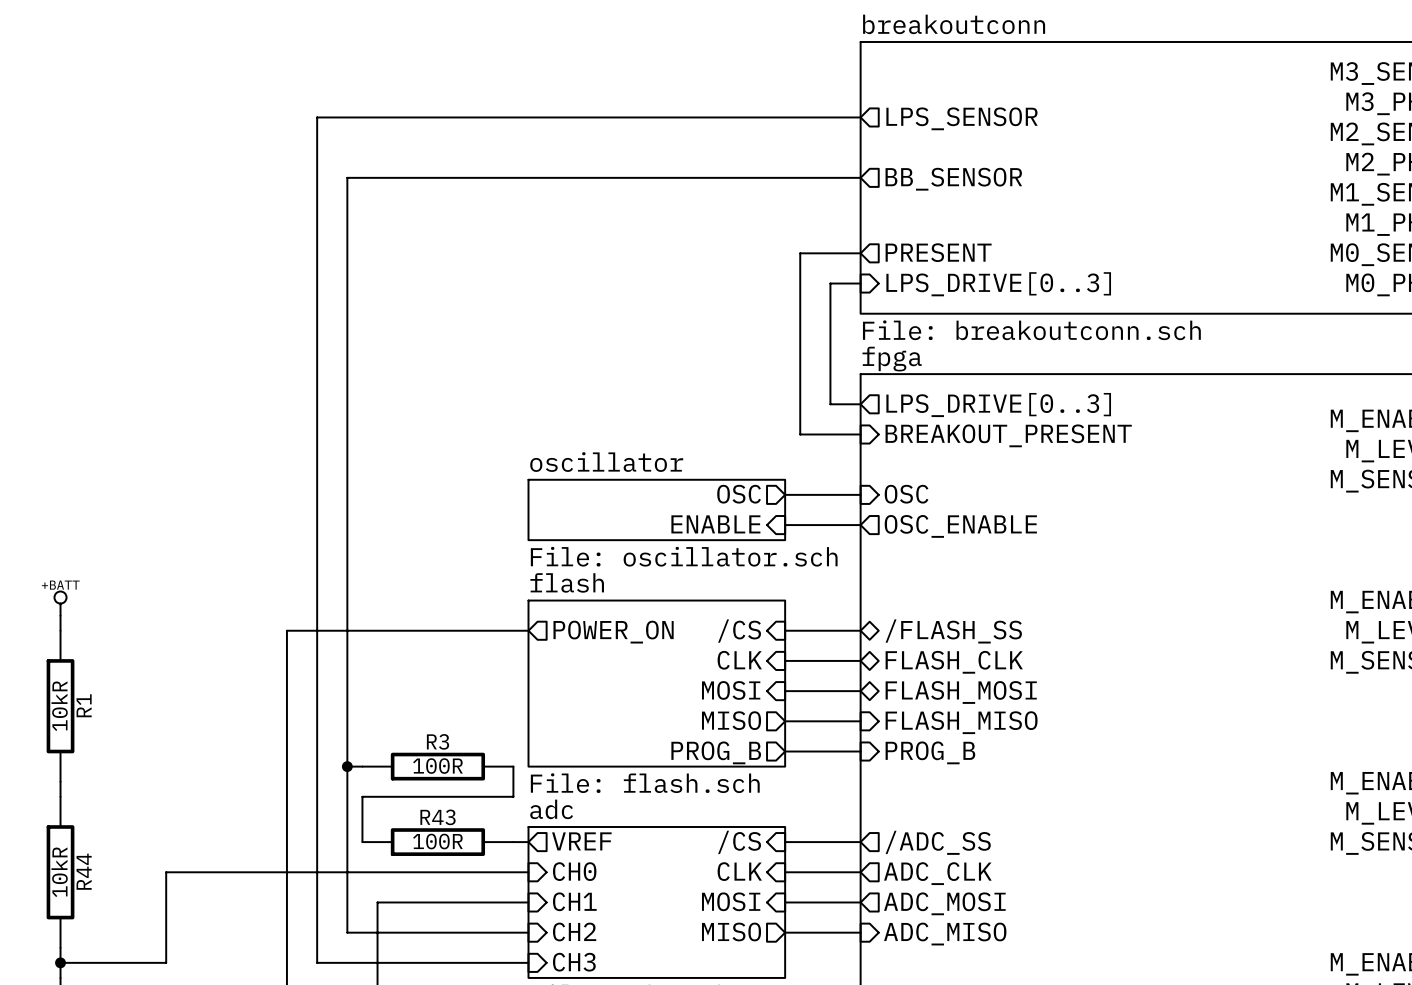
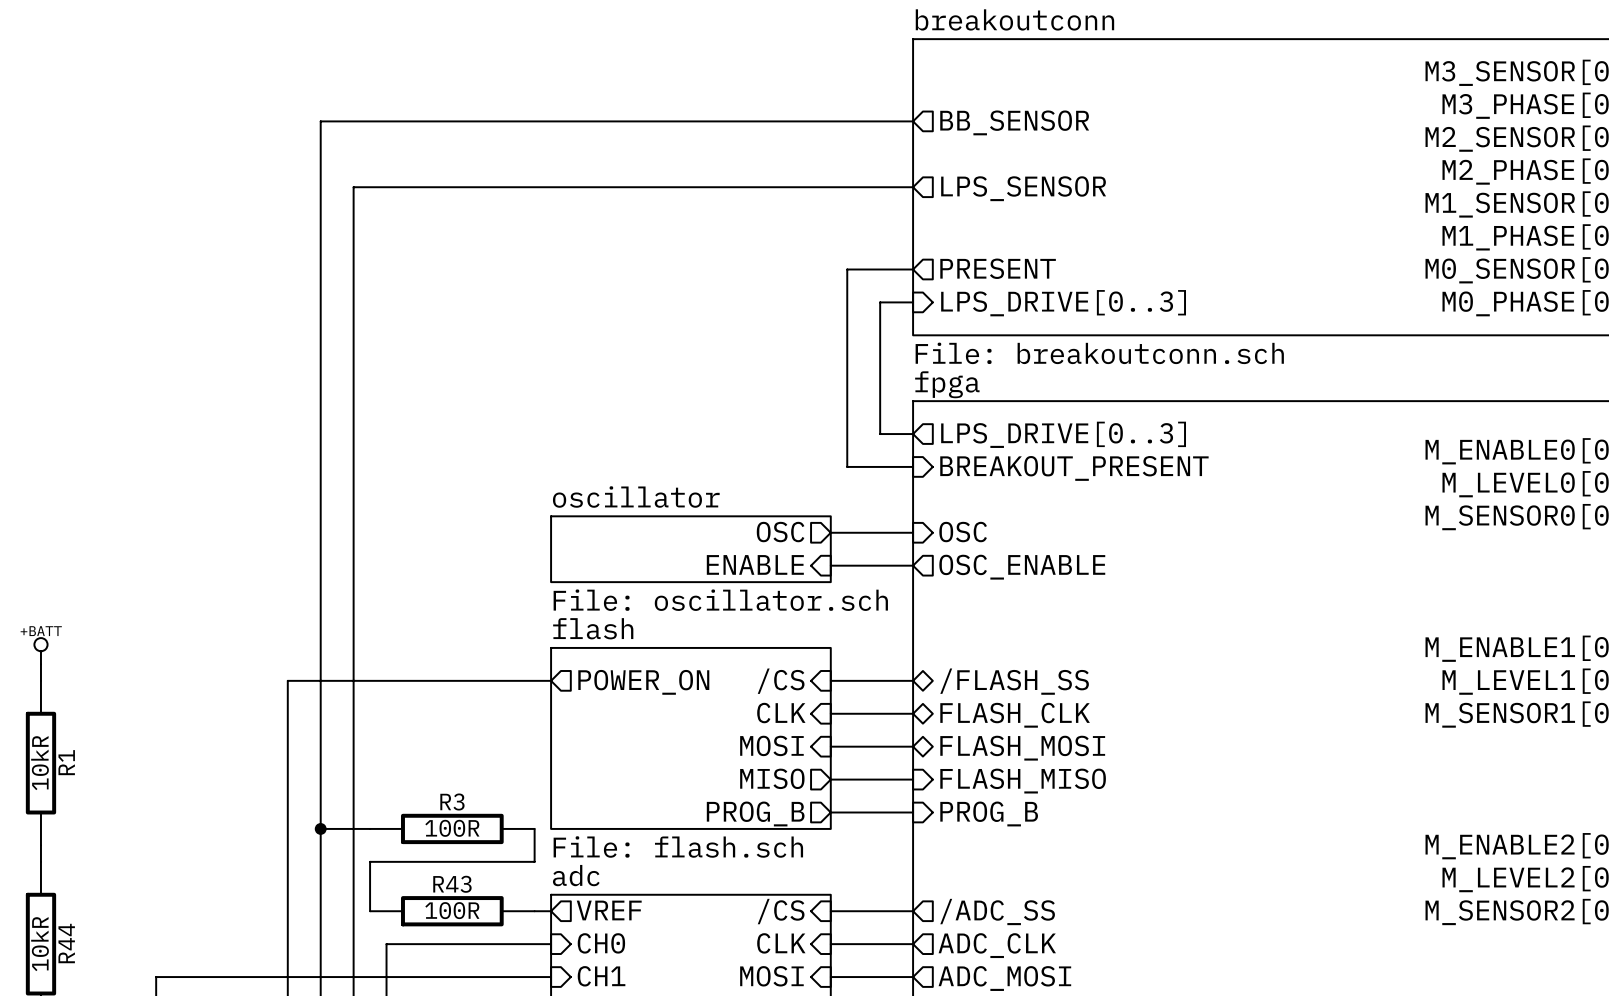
sheet pin: LPS_SENSOR (962, 118) -> BB_SENSOR (1014, 122)
sheet pin: BB_SENSOR (953, 179) -> LPS_SENSOR (1023, 188)
wire: none -> (320, 828) (353, 828)
junction position: (347, 766) -> (320, 828)
wire: (377, 872) (166, 872) (166, 902) -> (386, 944) (386, 977) (156, 977)

